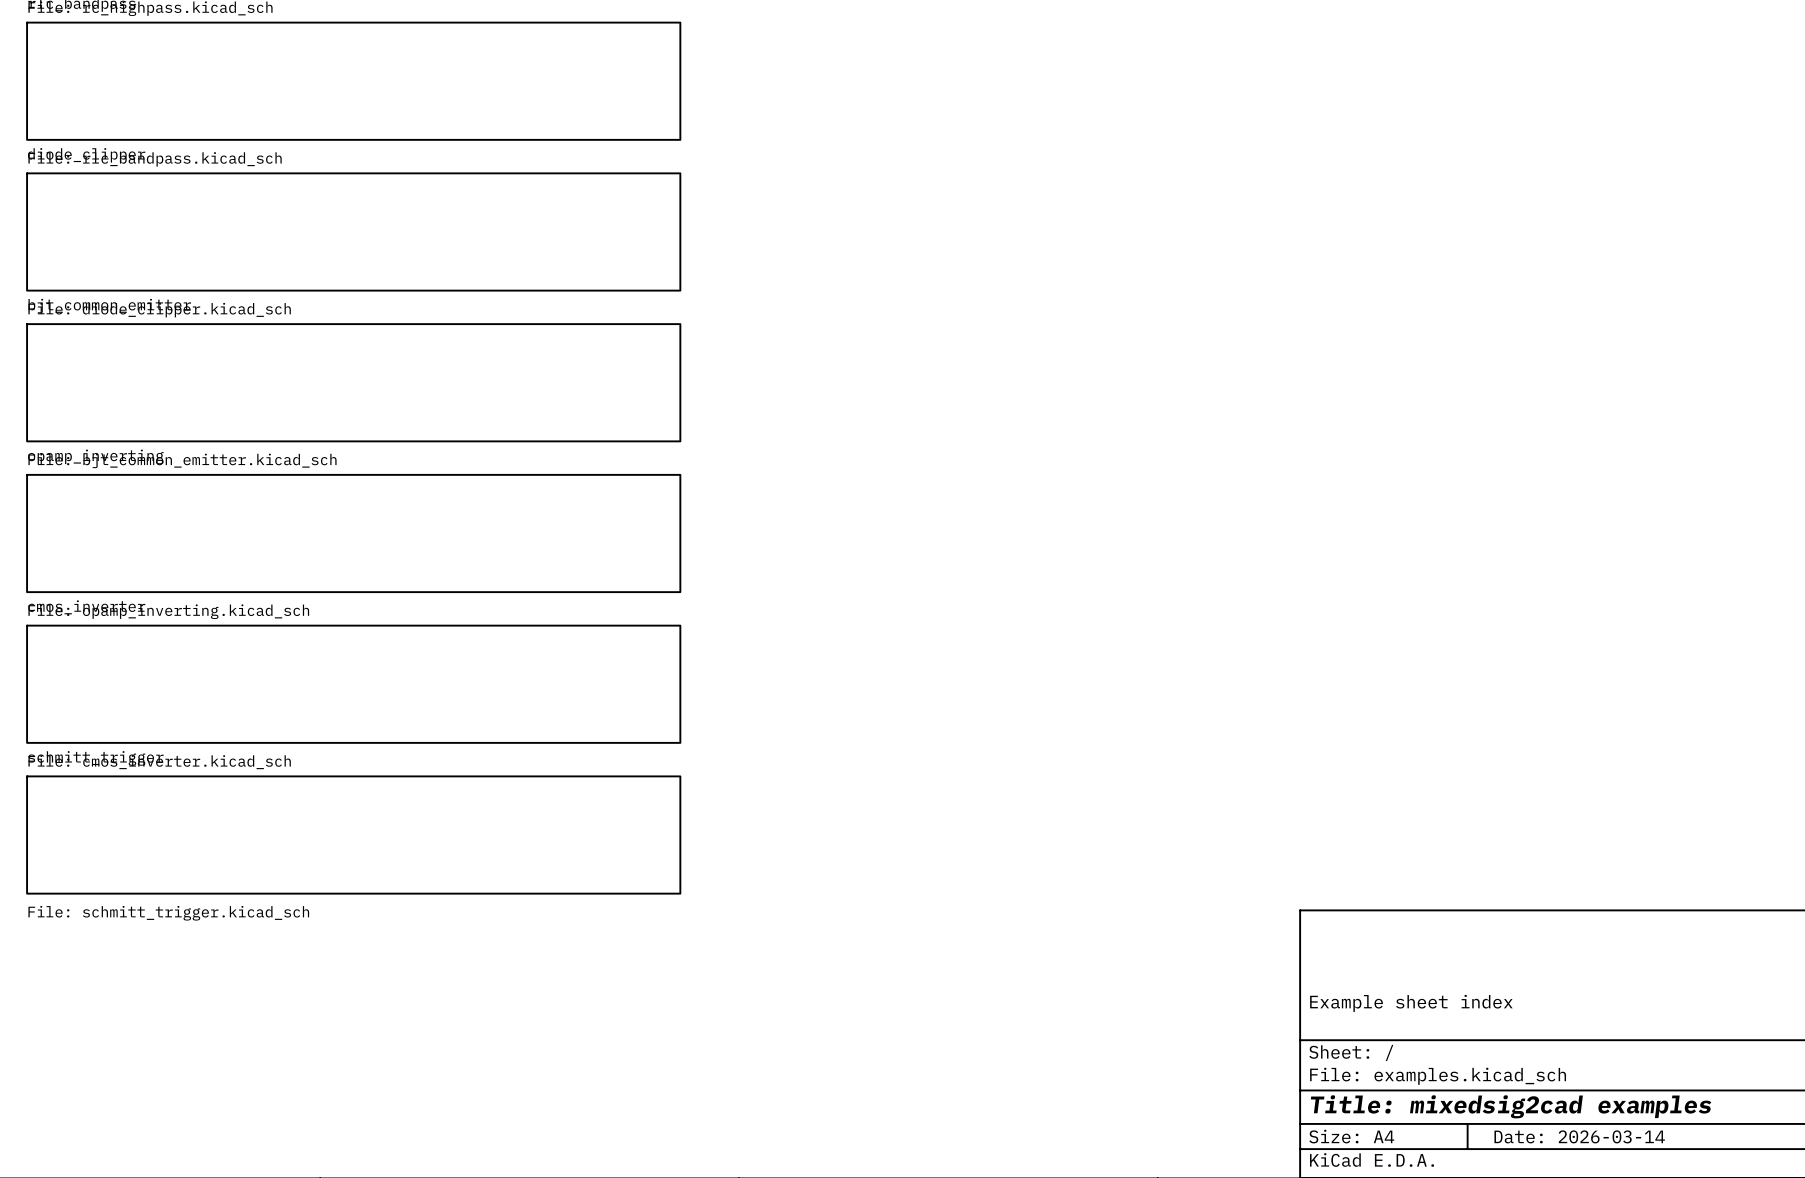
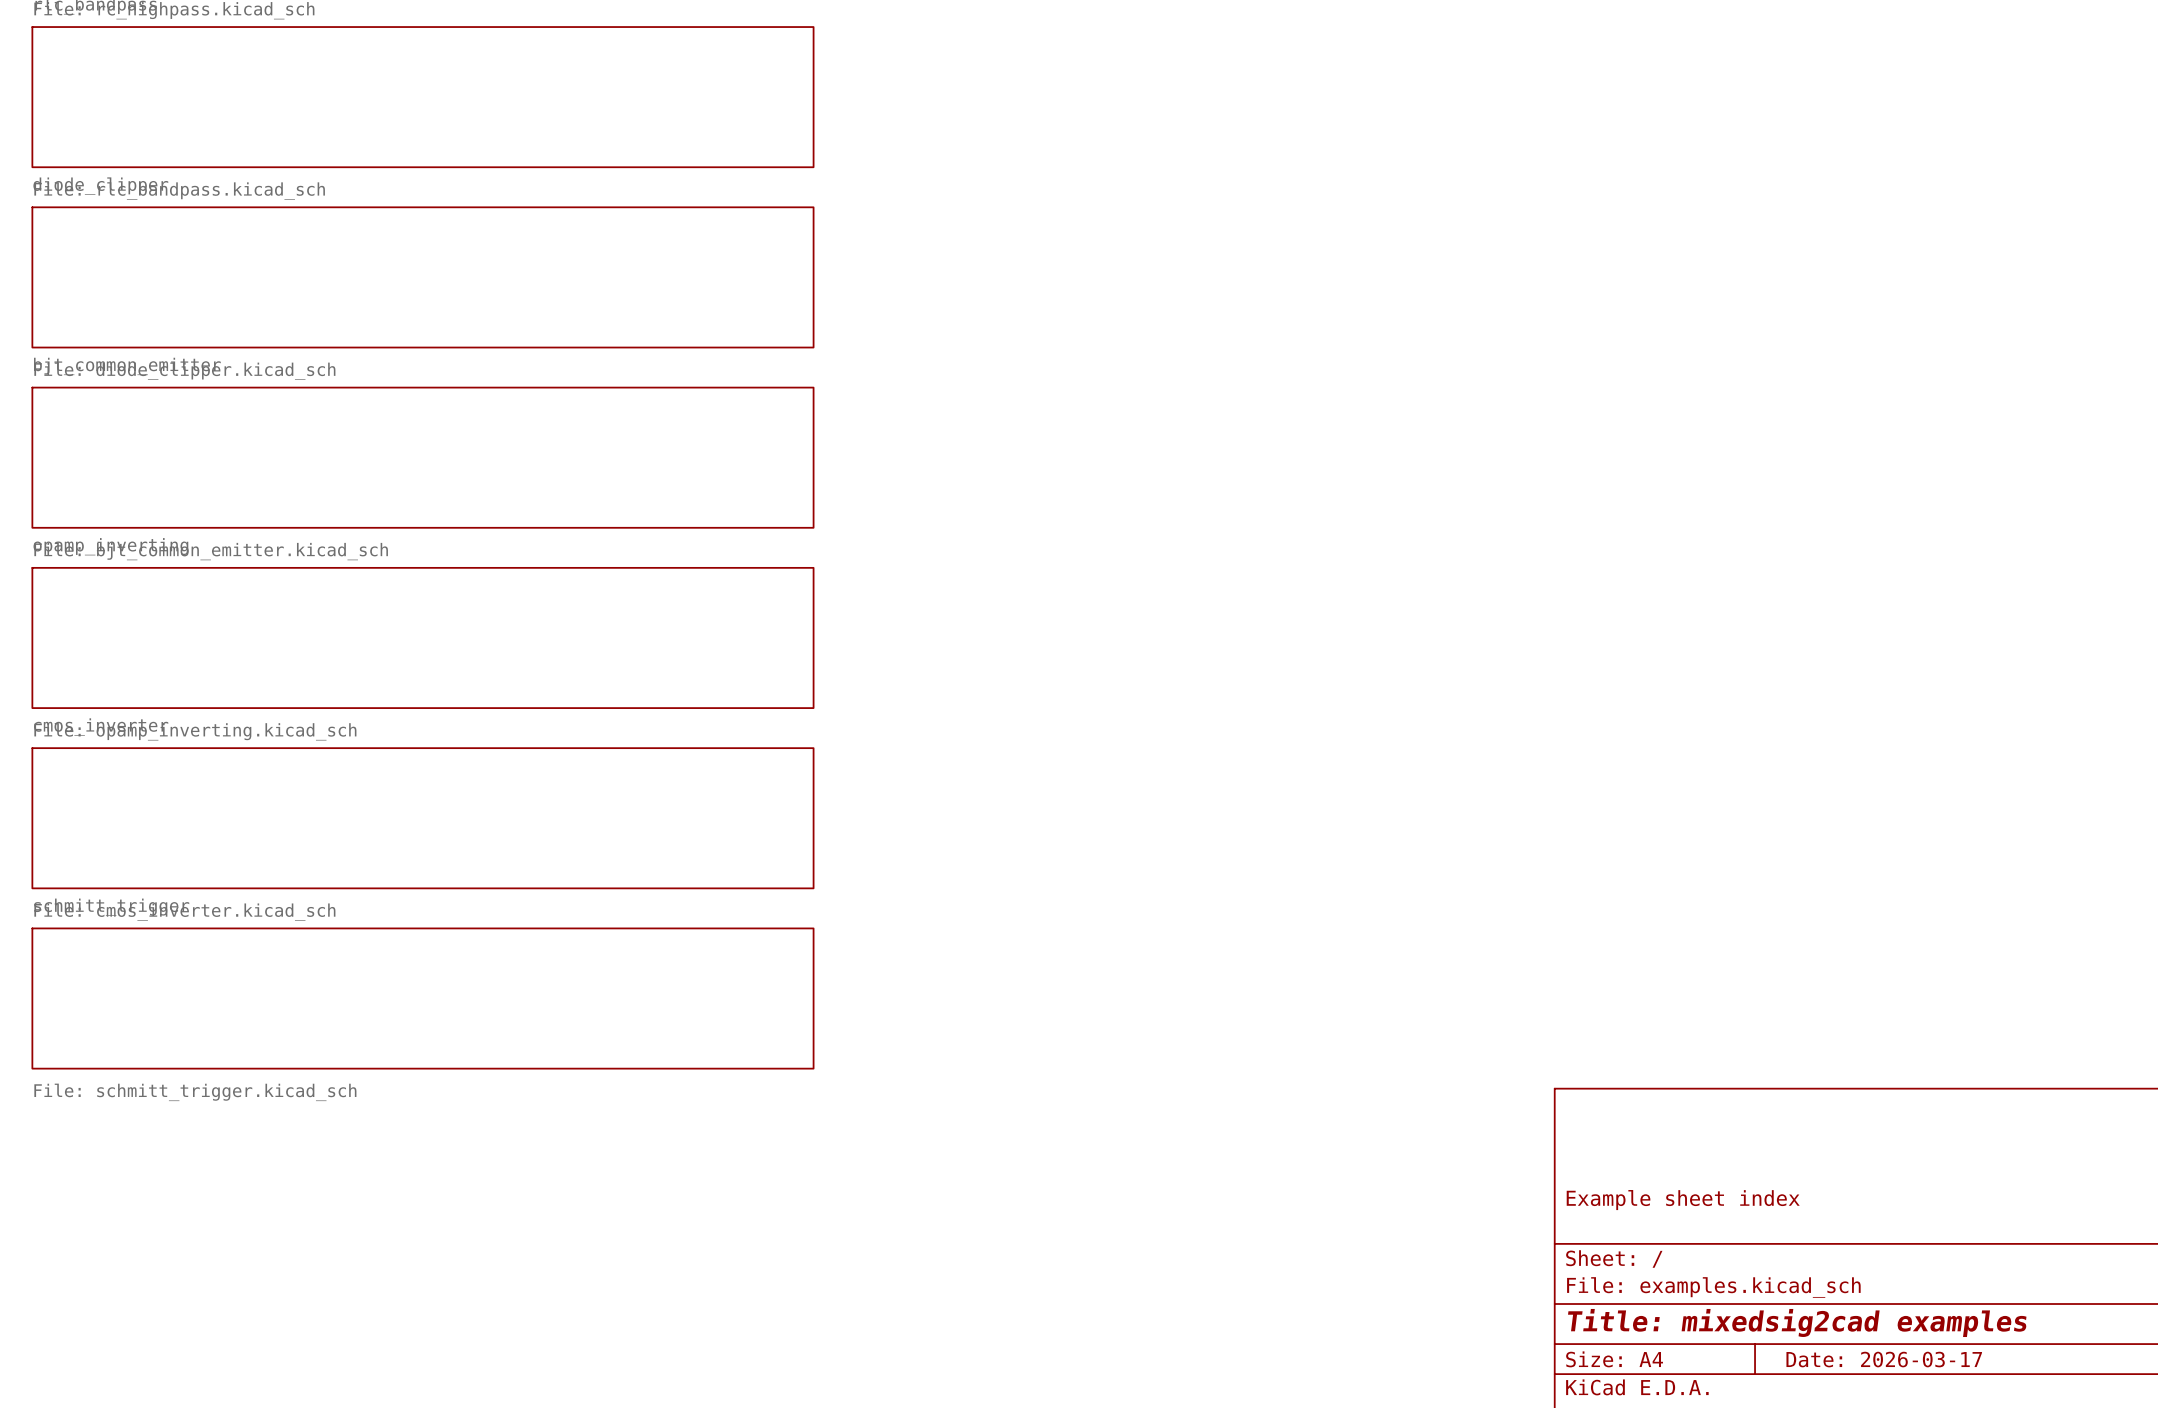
title block: Date: 2026-03-14 (1579, 1136) -> Date: 2026-03-17 (1884, 1359)

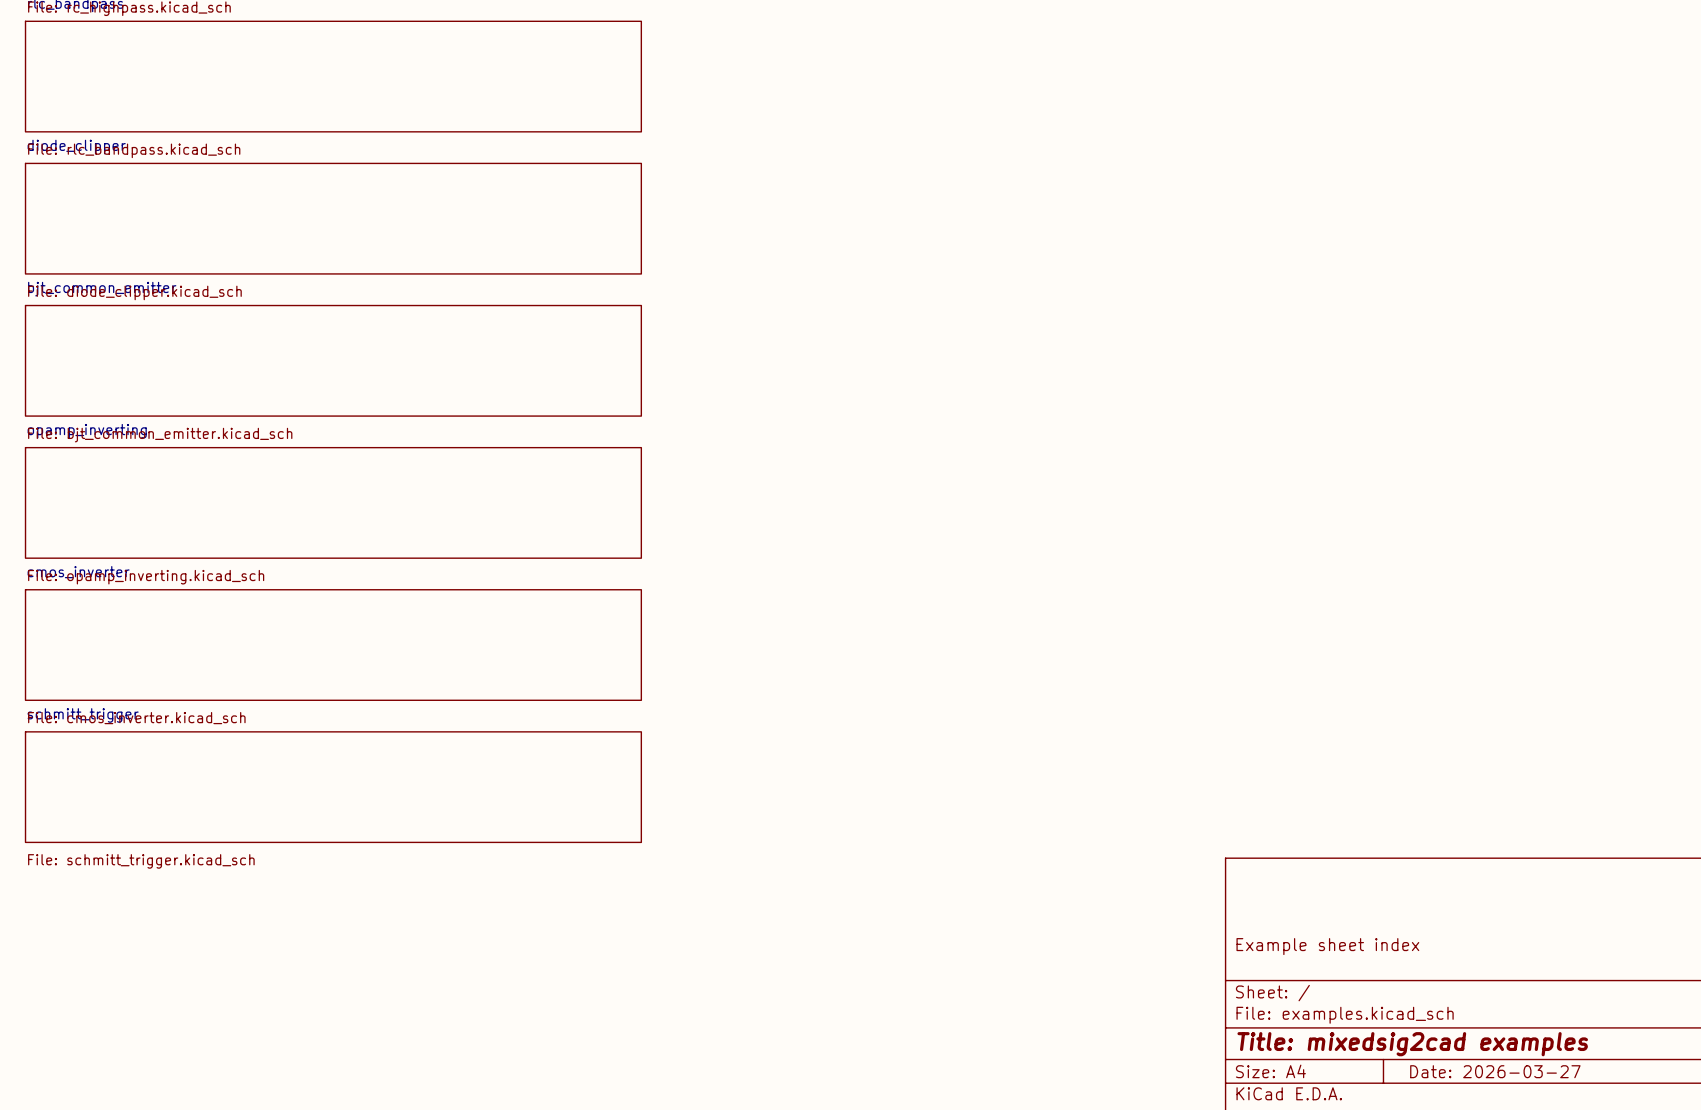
title block: Date: 2026-03-17 (1884, 1359) -> Date: 2026-03-27 (1495, 1071)

